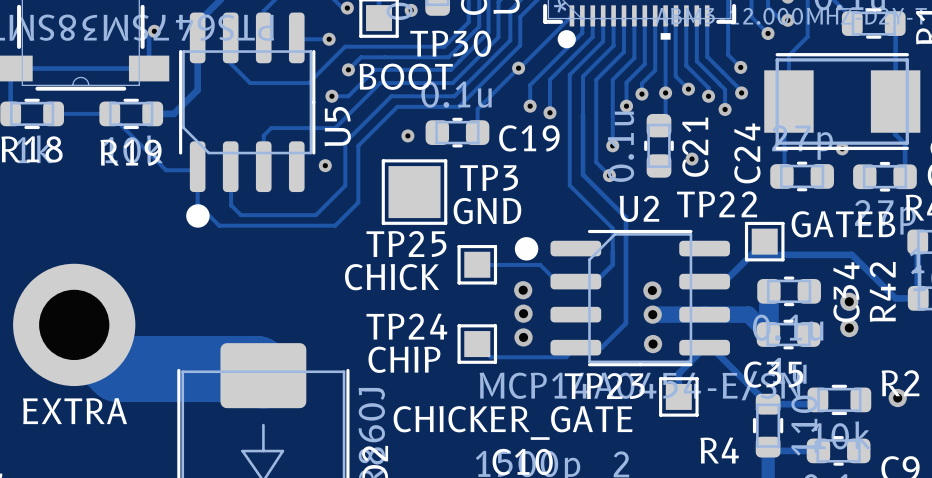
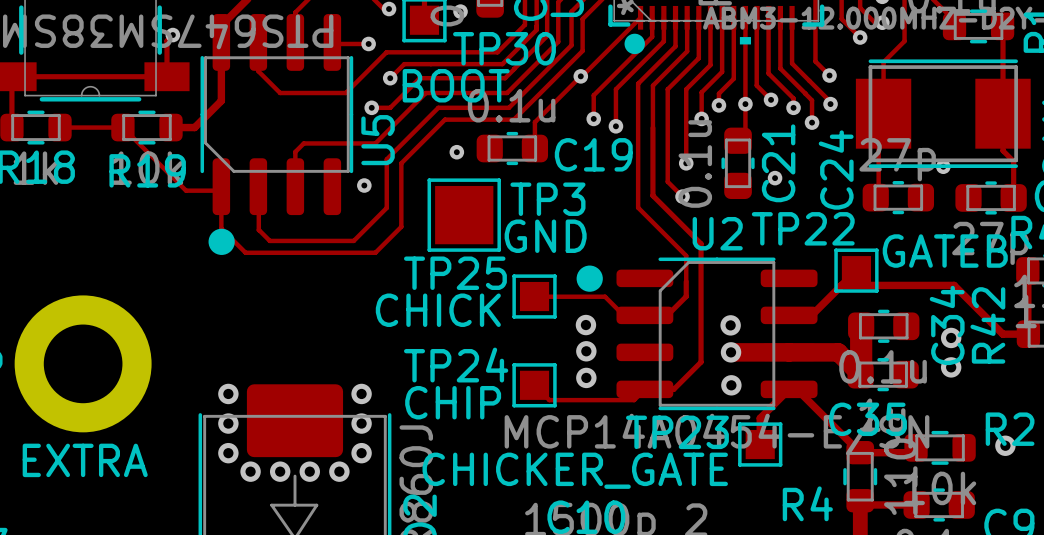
track: (74, 324) (118, 369) (256, 369) (263, 375) -> none
via: none -> (228, 393)
via: none -> (361, 393)
via: none -> (228, 423)
via: none -> (361, 423)
via: none -> (228, 453)
via: none -> (361, 453)
via: none -> (250, 471)
via: none -> (280, 471)
via: none -> (309, 471)
via: none -> (339, 471)

